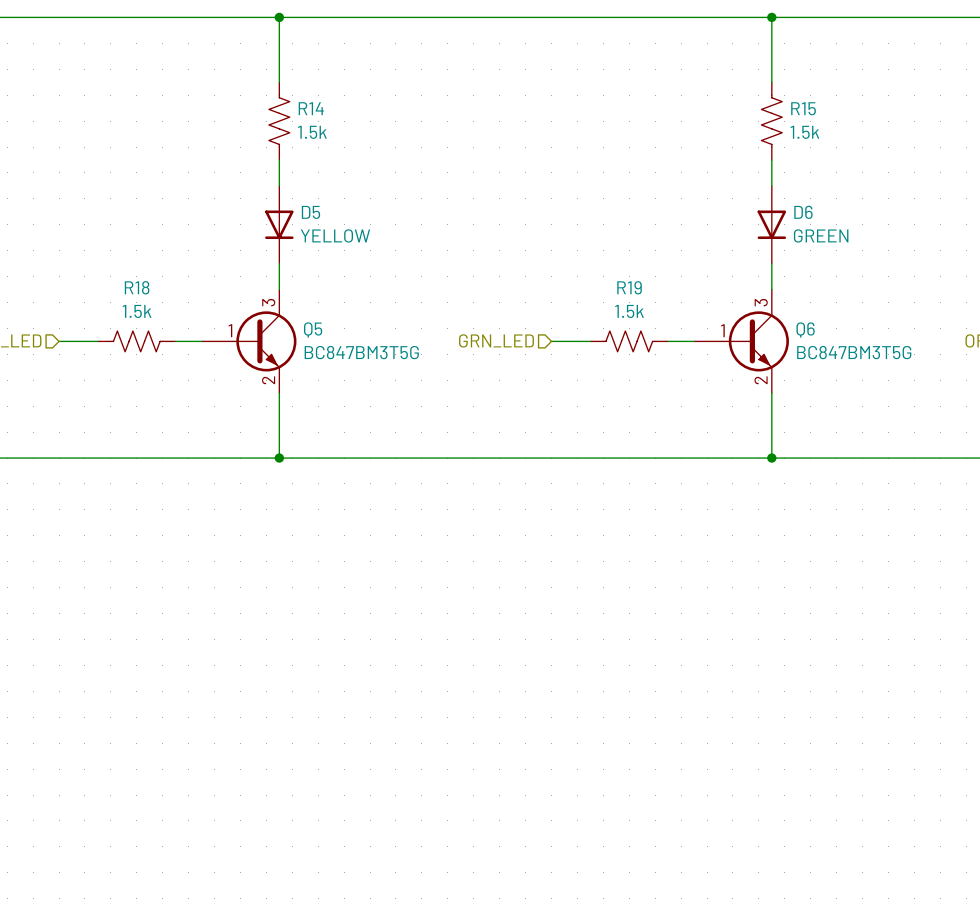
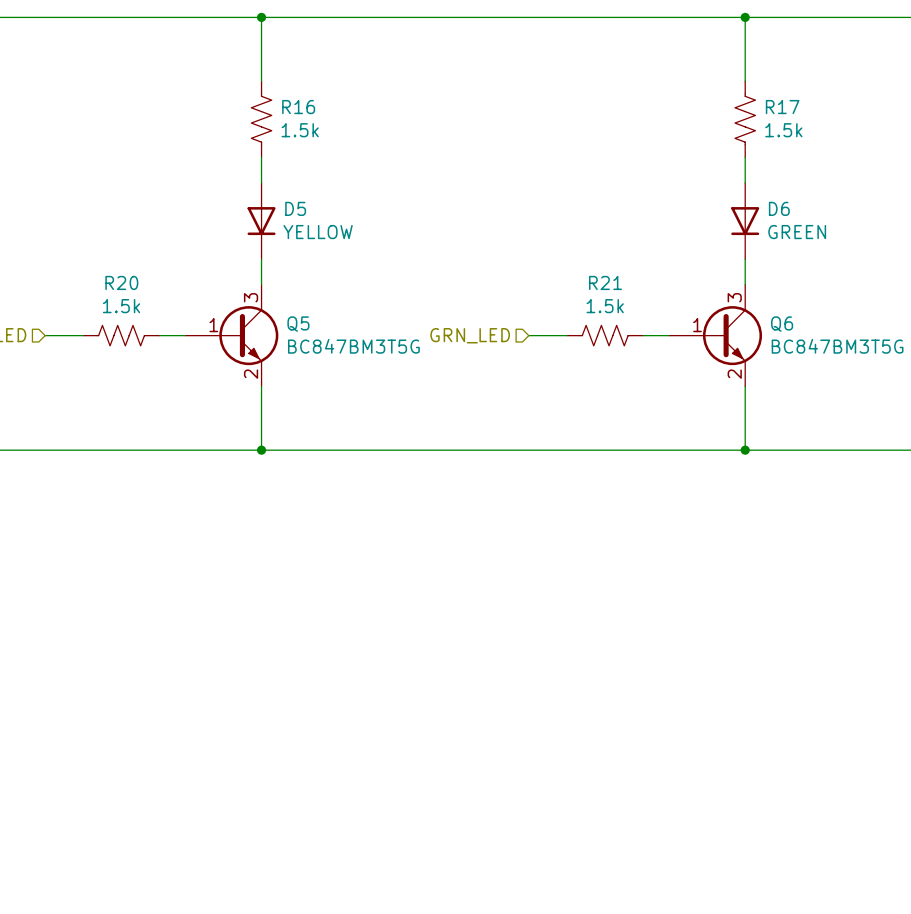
R14 name: R14 (311, 108) -> R16 (298, 107)
R15 name: R15 (803, 108) -> R17 (782, 107)
R18 name: R18 (137, 287) -> R20 (121, 282)
R19 name: R19 (629, 287) -> R21 (605, 282)

